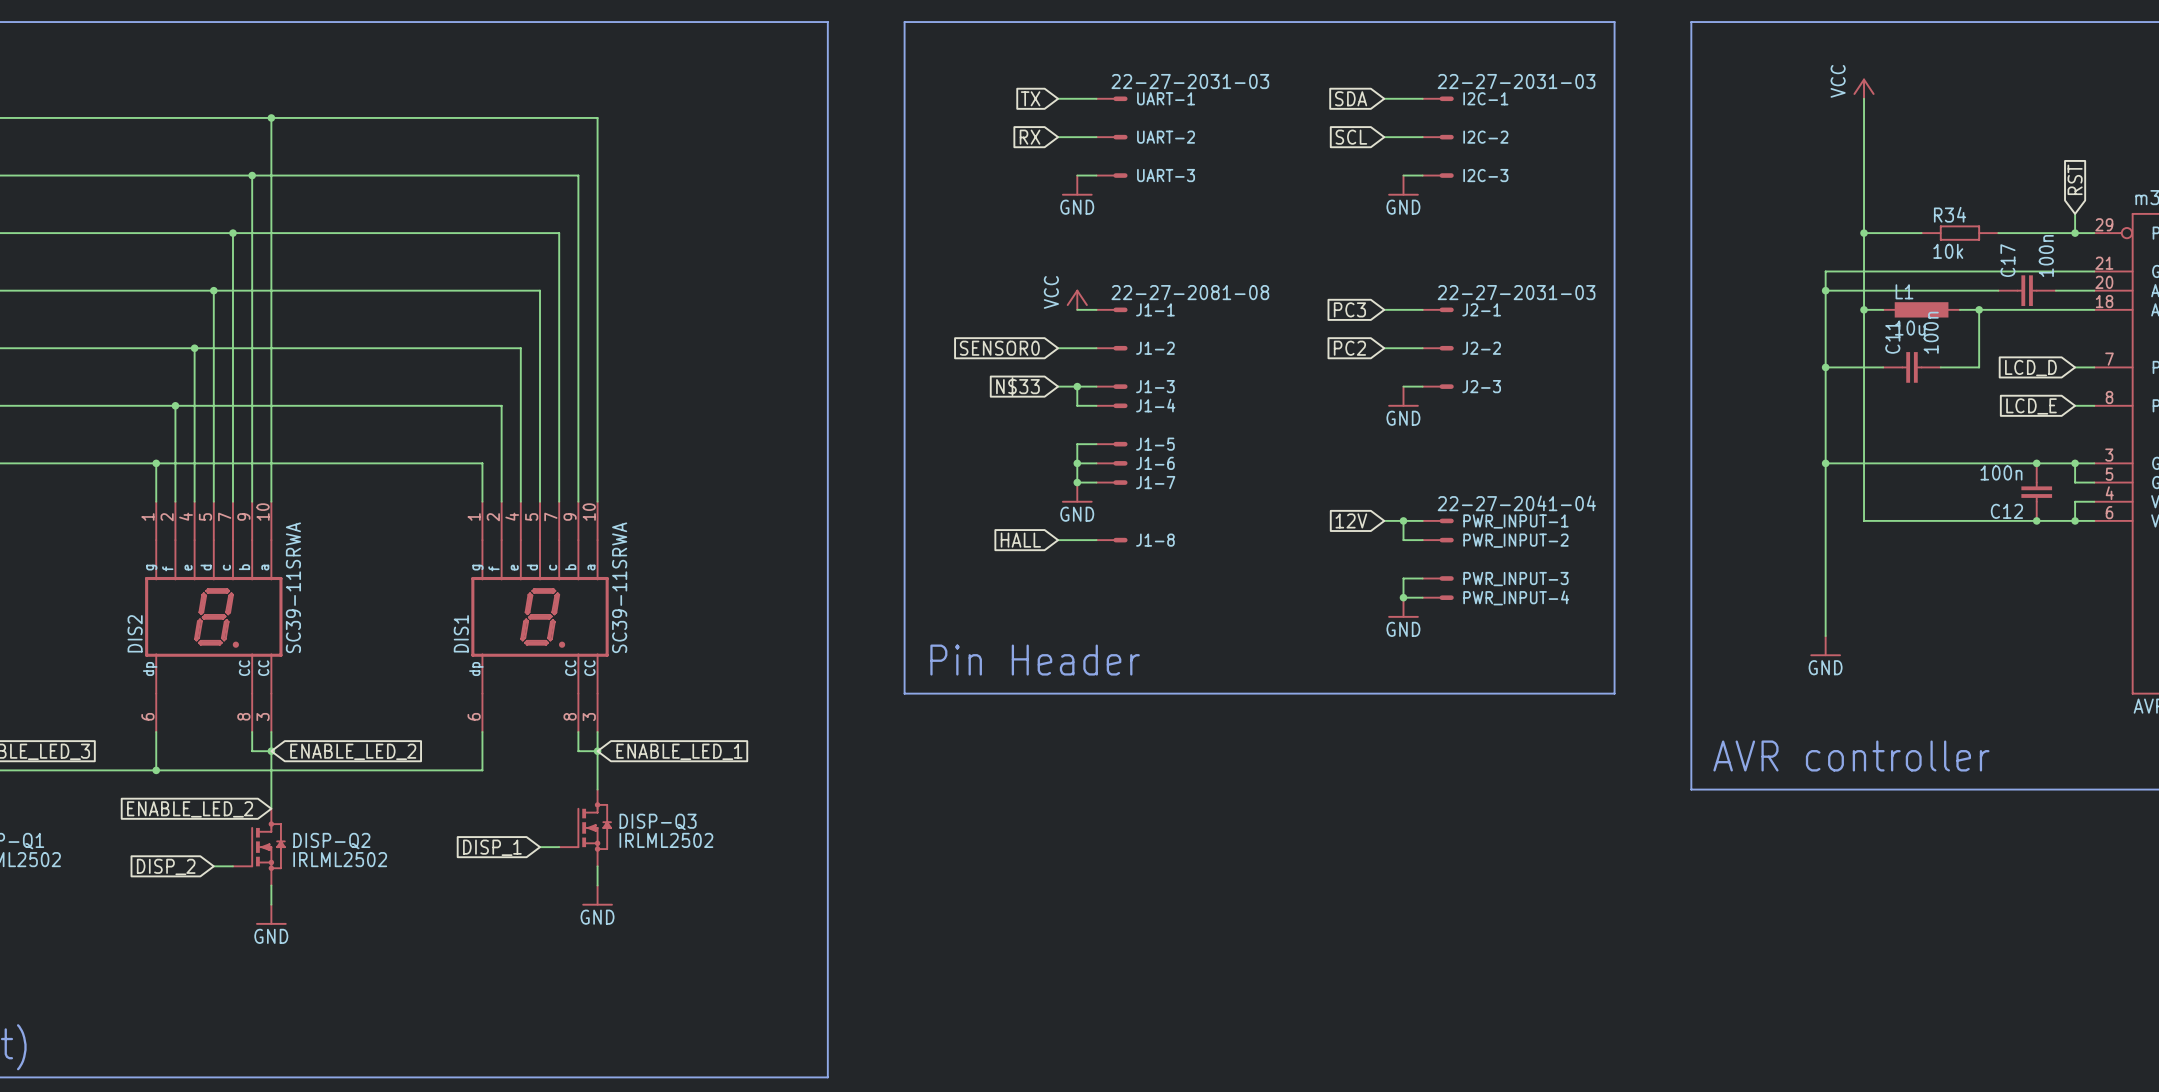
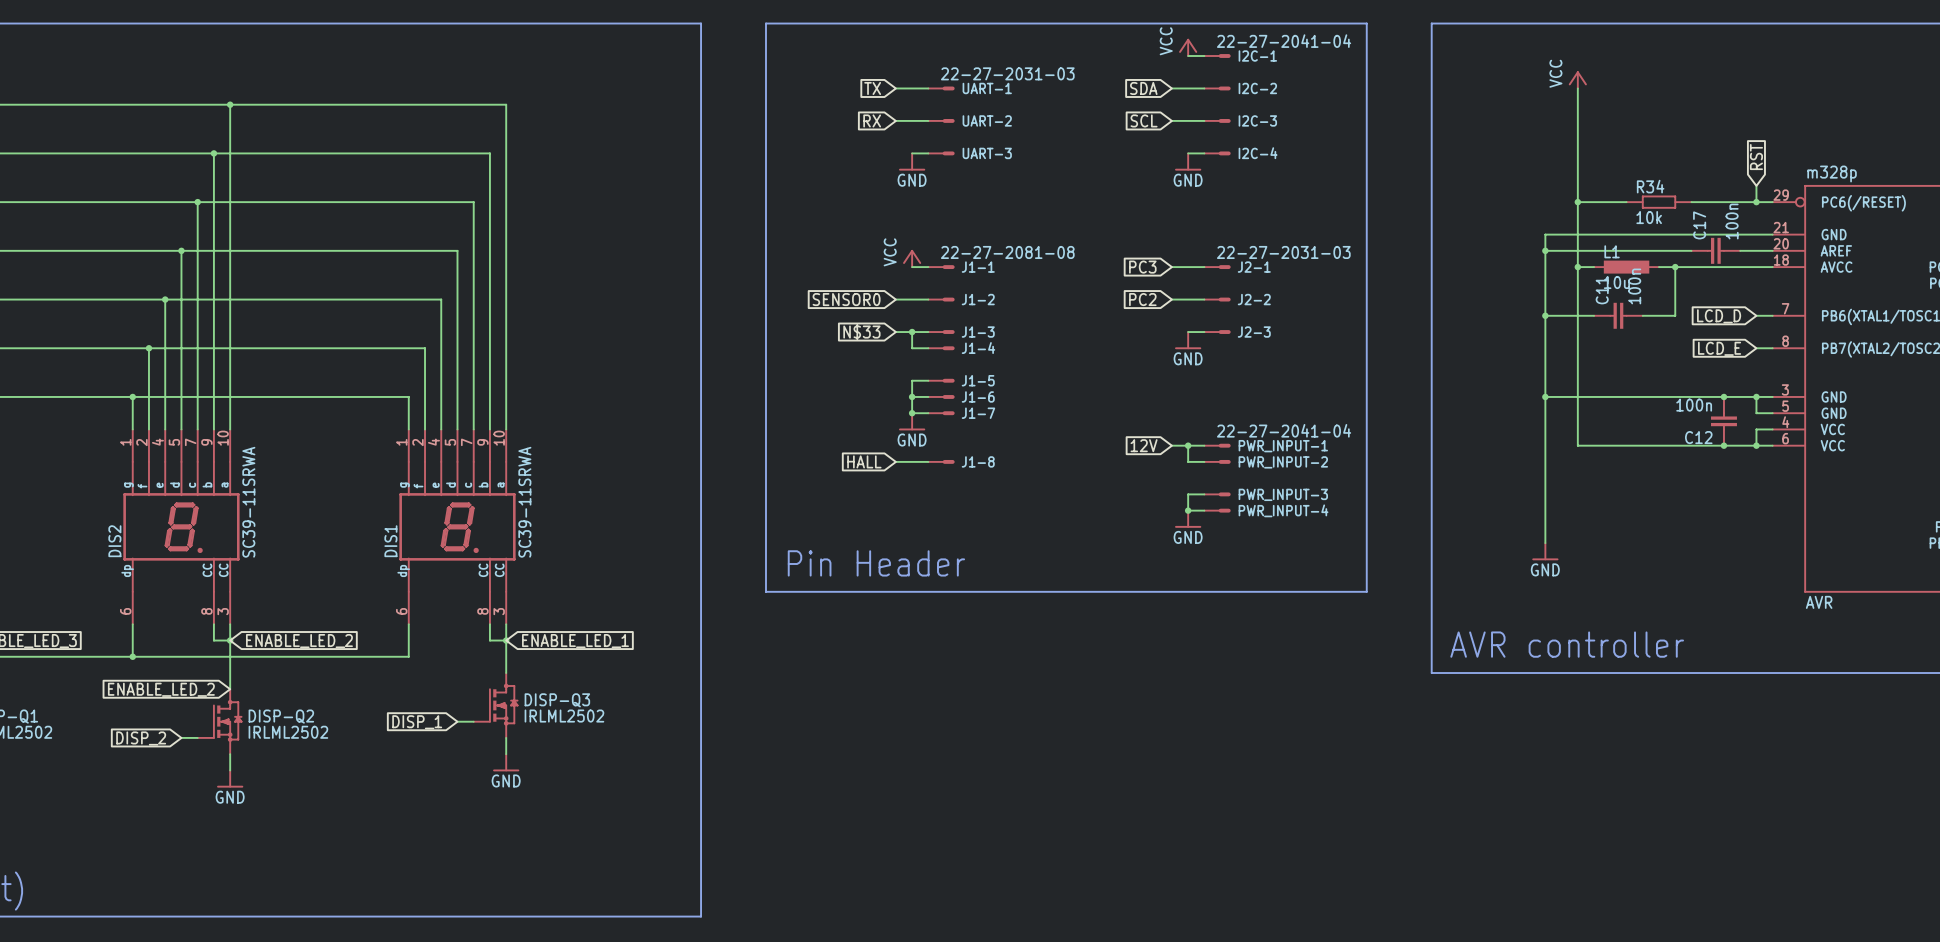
power symbol: none -> VCC (1188, 47)
wire: none -> (1188, 56) (1204, 56)
I2C-1: none -> 22-27-2041-04 (1217, 56)
I2C-1 value: 22-27-2031-03 (1516, 81) -> none
I2C-1 name: I2C-1 (1485, 98) -> I2C-2 (1257, 88)
I2C-2 name: I2C-2 (1485, 137) -> I2C-3 (1257, 120)
I2C-3 name: I2C-3 (1485, 175) -> I2C-4 (1258, 153)

